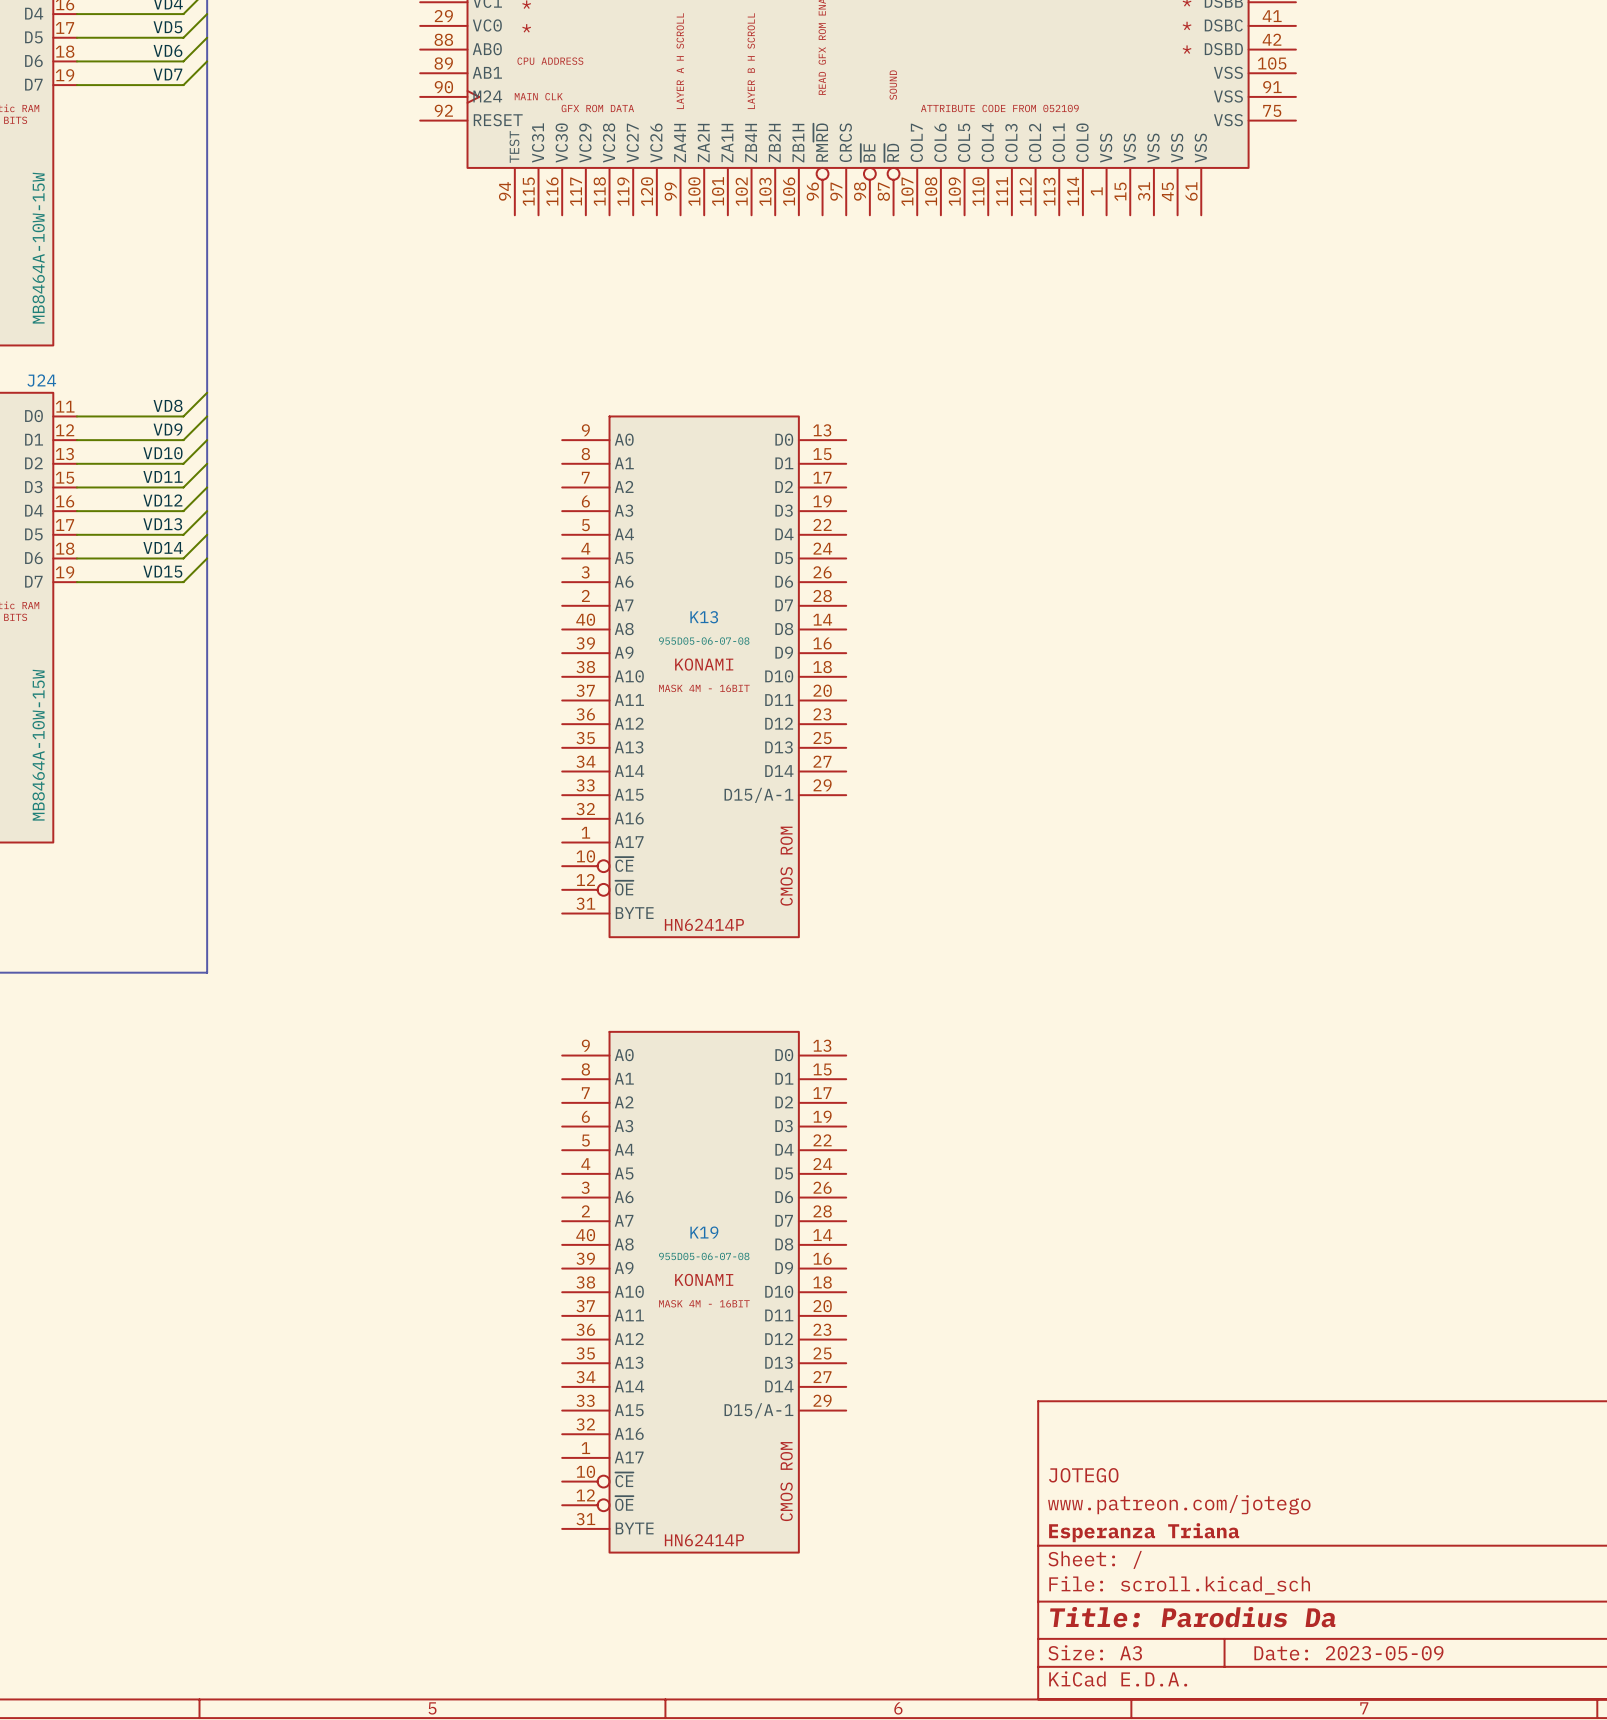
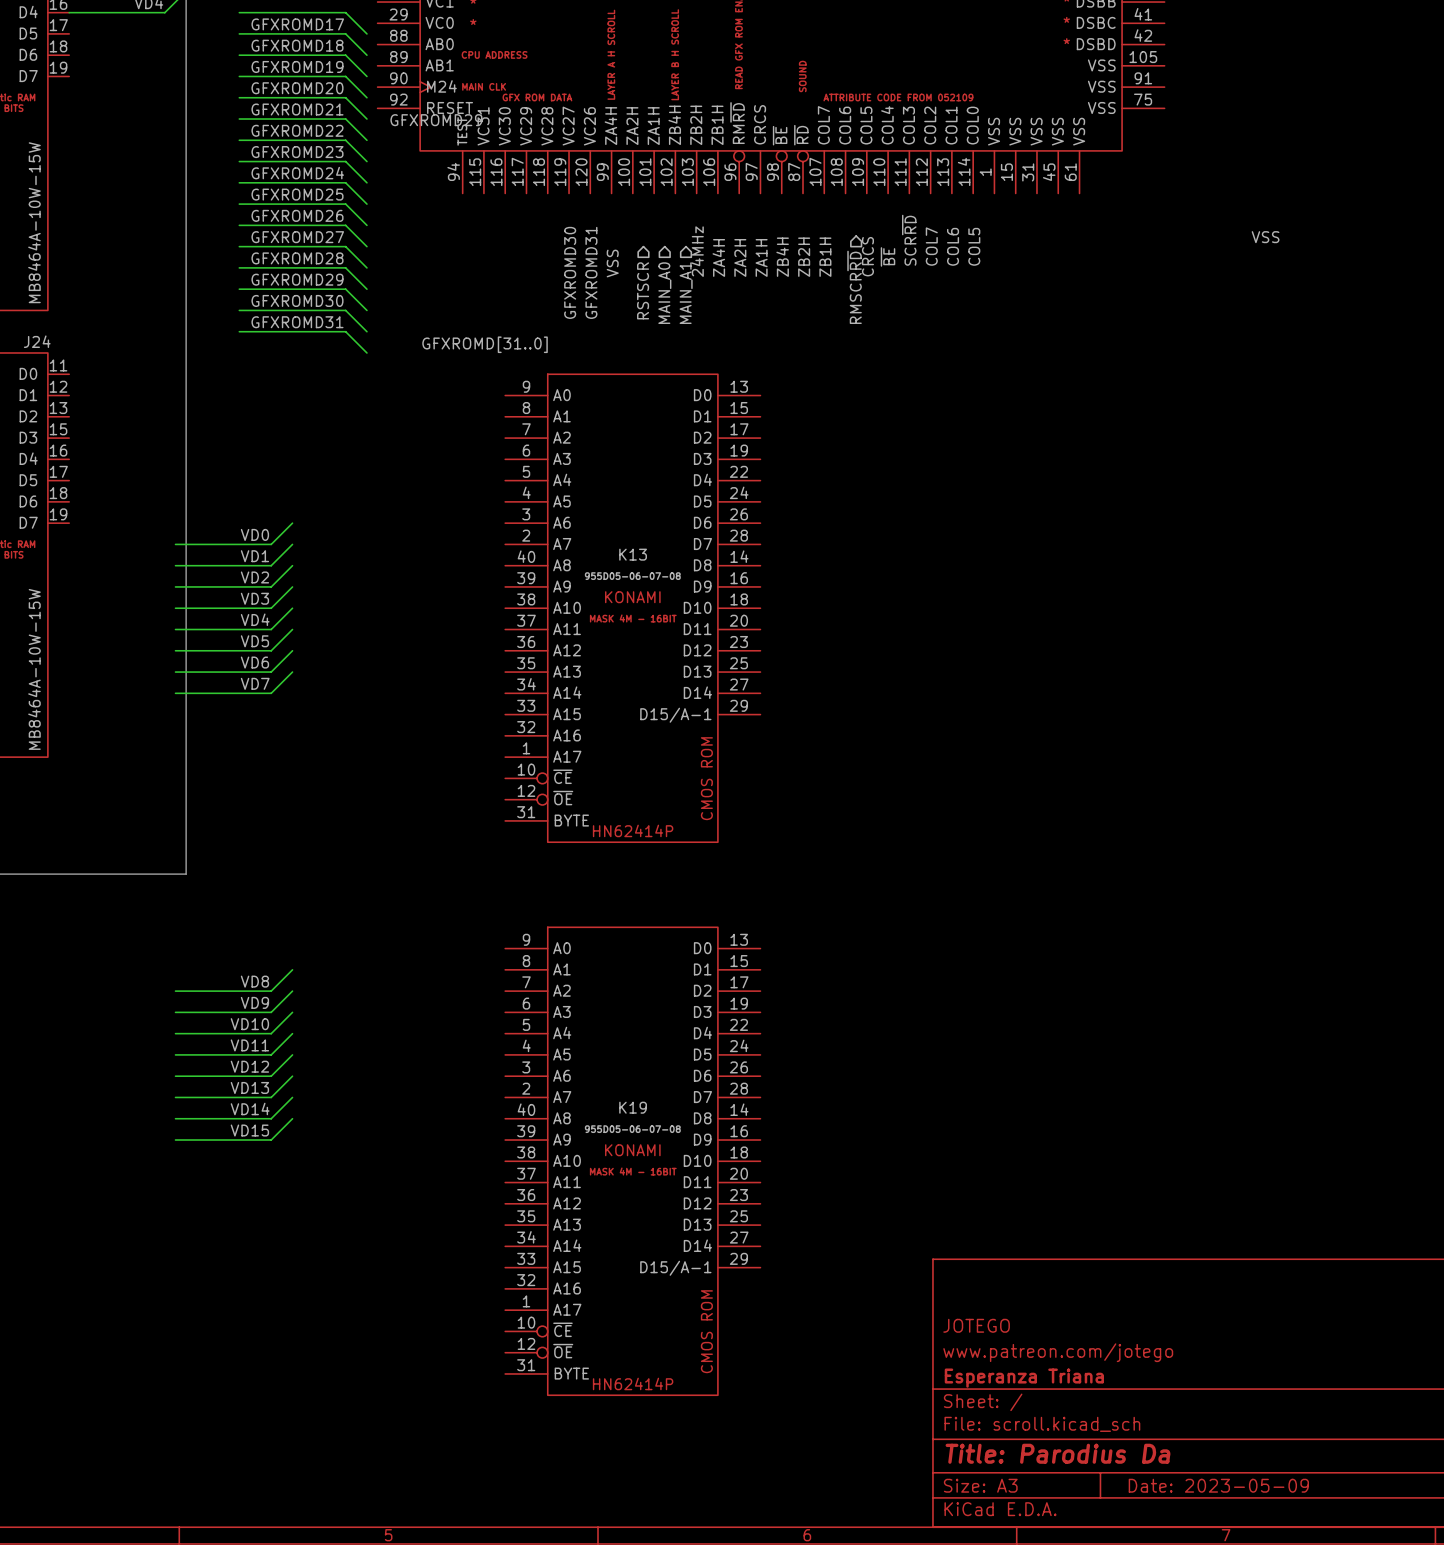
wire: (207, 14) (183, 37) (76, 37) -> none
wire: none -> (239, 12) (345, 12) (366, 33)
label: VD5 (167, 27) -> none
label: none -> GFXROMD17 (297, 24)
wire: (207, 37) (183, 61) (76, 61) -> none
wire: none -> (239, 33) (345, 33) (366, 55)
label: VD6 (167, 50) -> none
label: none -> GFXROMD18 (297, 45)
wire: (207, 61) (183, 85) (76, 85) -> none
wire: none -> (239, 55) (345, 55) (366, 76)
label: VD7 (167, 74) -> none
label: none -> GFXROMD19 (297, 66)
wire: none -> (239, 76) (345, 76) (366, 97)
label: none -> GFXROMD20 (297, 88)
wire: none -> (239, 97) (345, 97) (366, 119)
label: none -> GFXROMD21 (297, 109)
wire: none -> (239, 119) (345, 119) (366, 140)
label: none -> GFXROMD29 (436, 120)
label: none -> GFXROMD22 (297, 130)
wire: none -> (239, 140) (345, 140) (366, 161)
label: none -> GFXROMD23 (297, 152)
wire: none -> (239, 161) (345, 161) (366, 182)
label: none -> GFXROMD24 (297, 173)
wire: none -> (239, 182) (345, 182) (366, 204)
label: none -> GFXROMD25 (297, 194)
wire: none -> (239, 204) (345, 204) (366, 225)
label: none -> GFXROMD26 (297, 215)
wire: none -> (239, 225) (345, 225) (366, 246)
label: none -> GFXROMD27 (297, 237)
label: none -> VSS (1265, 237)
label: none -> SCR~{RD} (909, 240)
wire: none -> (239, 246) (345, 246) (366, 267)
label: none -> COL7 (931, 246)
label: none -> COL6 (953, 246)
label: none -> COL5 (974, 246)
label: none -> 24MHz (697, 251)
label: none -> GFXROMD28 (297, 258)
label: none -> ~{BE} (888, 256)
label: none -> ZA4H (718, 257)
label: none -> ZA2H (740, 257)
label: none -> ZA1H (761, 257)
label: none -> ZB4H (782, 257)
label: none -> ZB2H (804, 257)
label: none -> ZB1H (825, 257)
label: none -> CRCS (867, 256)
label: none -> VSS (612, 263)
wire: none -> (239, 267) (345, 267) (366, 289)
label: none -> GFXROMD29 (297, 279)
label: none -> GFXROMD30 (570, 272)
label: none -> GFXROMD31 (591, 272)
hierarchical label: none -> RMSCR~{RD} (854, 287)
hierarchical label: none -> RSTSCR (643, 290)
wire: none -> (239, 289) (345, 289) (366, 310)
hierarchical label: none -> MAIN_A0 (664, 293)
hierarchical label: none -> MAIN_A1 (686, 293)
label: none -> GFXROMD30 (297, 300)
wire: none -> (239, 310) (345, 310) (366, 331)
label: none -> GFXROMD31 (297, 322)
wire: none -> (239, 331) (345, 331) (366, 352)
label: none -> GFXROMD[31..0] (485, 344)
wire: (207, 392) (183, 416) (76, 416) -> (292, 523) (271, 544) (175, 544)
label: VD8 (168, 405) -> none
wire: (207, 416) (183, 440) (76, 440) -> (292, 544) (271, 565) (175, 565)
label: VD9 (167, 429) -> none
wire: (207, 440) (183, 463) (76, 463) -> (292, 565) (271, 586) (175, 586)
label: VD10 (162, 453) -> none
wire: (207, 463) (183, 487) (76, 487) -> (292, 586) (271, 608) (175, 608)
label: VD11 (163, 476) -> none
wire: (207, 487) (183, 511) (76, 511) -> (292, 608) (271, 629) (175, 629)
label: VD12 (162, 500) -> none
wire: (207, 511) (183, 534) (76, 534) -> (292, 629) (271, 650) (175, 650)
label: VD13 (162, 524) -> none
wire: (207, 534) (183, 558) (76, 558) -> (292, 650) (271, 672) (175, 672)
label: VD14 (163, 547) -> none
wire: (207, 558) (183, 582) (76, 582) -> (292, 672) (271, 693) (175, 693)
label: VD15 (162, 571) -> none
label: none -> VD0 (254, 534)
label: none -> VD1 (254, 556)
label: none -> VD2 (254, 577)
label: none -> VD3 (254, 598)
label: none -> VD4 (255, 619)
label: none -> VD5 (254, 641)
label: none -> VD6 (254, 662)
label: none -> VD7 (255, 683)
wire: none -> (292, 969) (271, 991) (175, 991)
label: none -> VD8 (254, 981)
wire: none -> (292, 991) (271, 1012) (175, 1012)
label: none -> VD9 (254, 1002)
wire: none -> (292, 1012) (271, 1033) (175, 1033)
label: none -> VD10 (249, 1024)
wire: none -> (292, 1033) (271, 1054) (175, 1054)
label: none -> VD11 (249, 1045)
wire: none -> (292, 1054) (271, 1076) (175, 1076)
label: none -> VD12 (249, 1066)
wire: none -> (292, 1076) (271, 1097) (175, 1097)
label: none -> VD13 (249, 1087)
wire: none -> (292, 1097) (271, 1118) (175, 1118)
label: none -> VD14 (250, 1108)
wire: none -> (292, 1118) (271, 1140) (175, 1140)
label: none -> VD15 (249, 1130)

